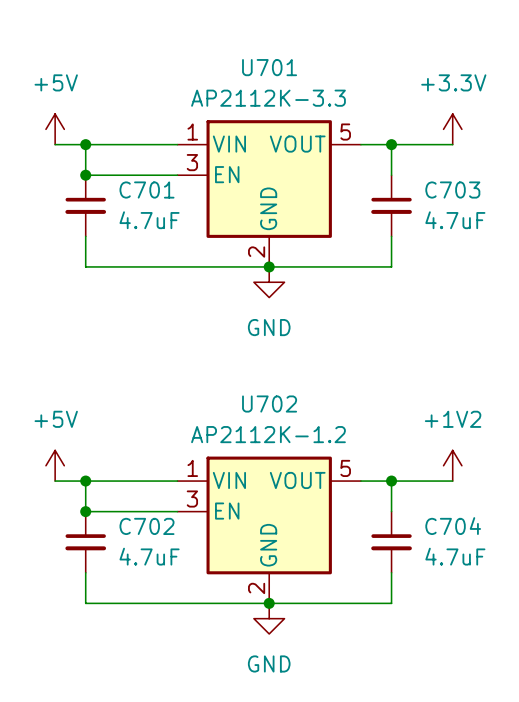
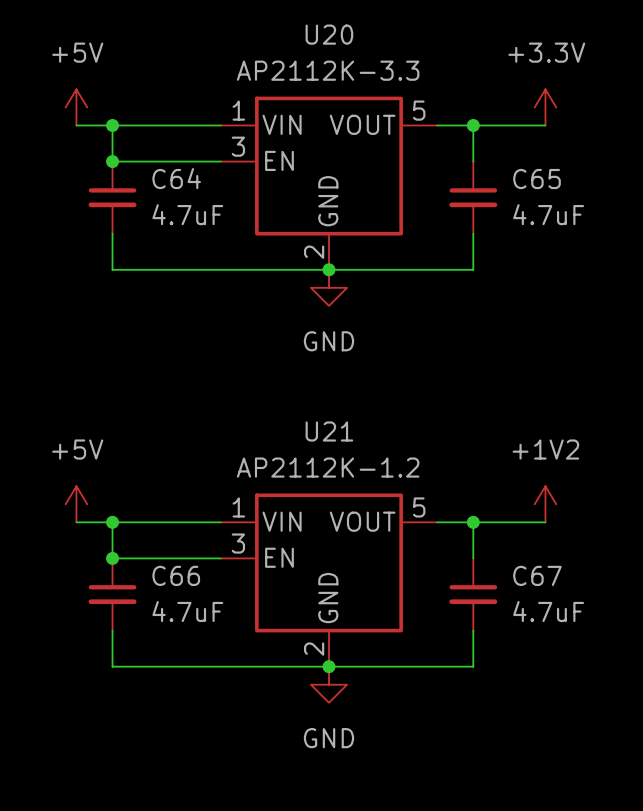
U701 name: U701 (269, 67) -> U20 (329, 34)
C701 name: C701 (146, 190) -> C64 (176, 178)
C703 name: C703 (452, 190) -> C65 (537, 179)
U702 name: U702 (269, 404) -> U21 (329, 431)
C702 name: C702 (146, 526) -> C66 (176, 575)
C704 name: C704 (453, 526) -> C67 (537, 575)

